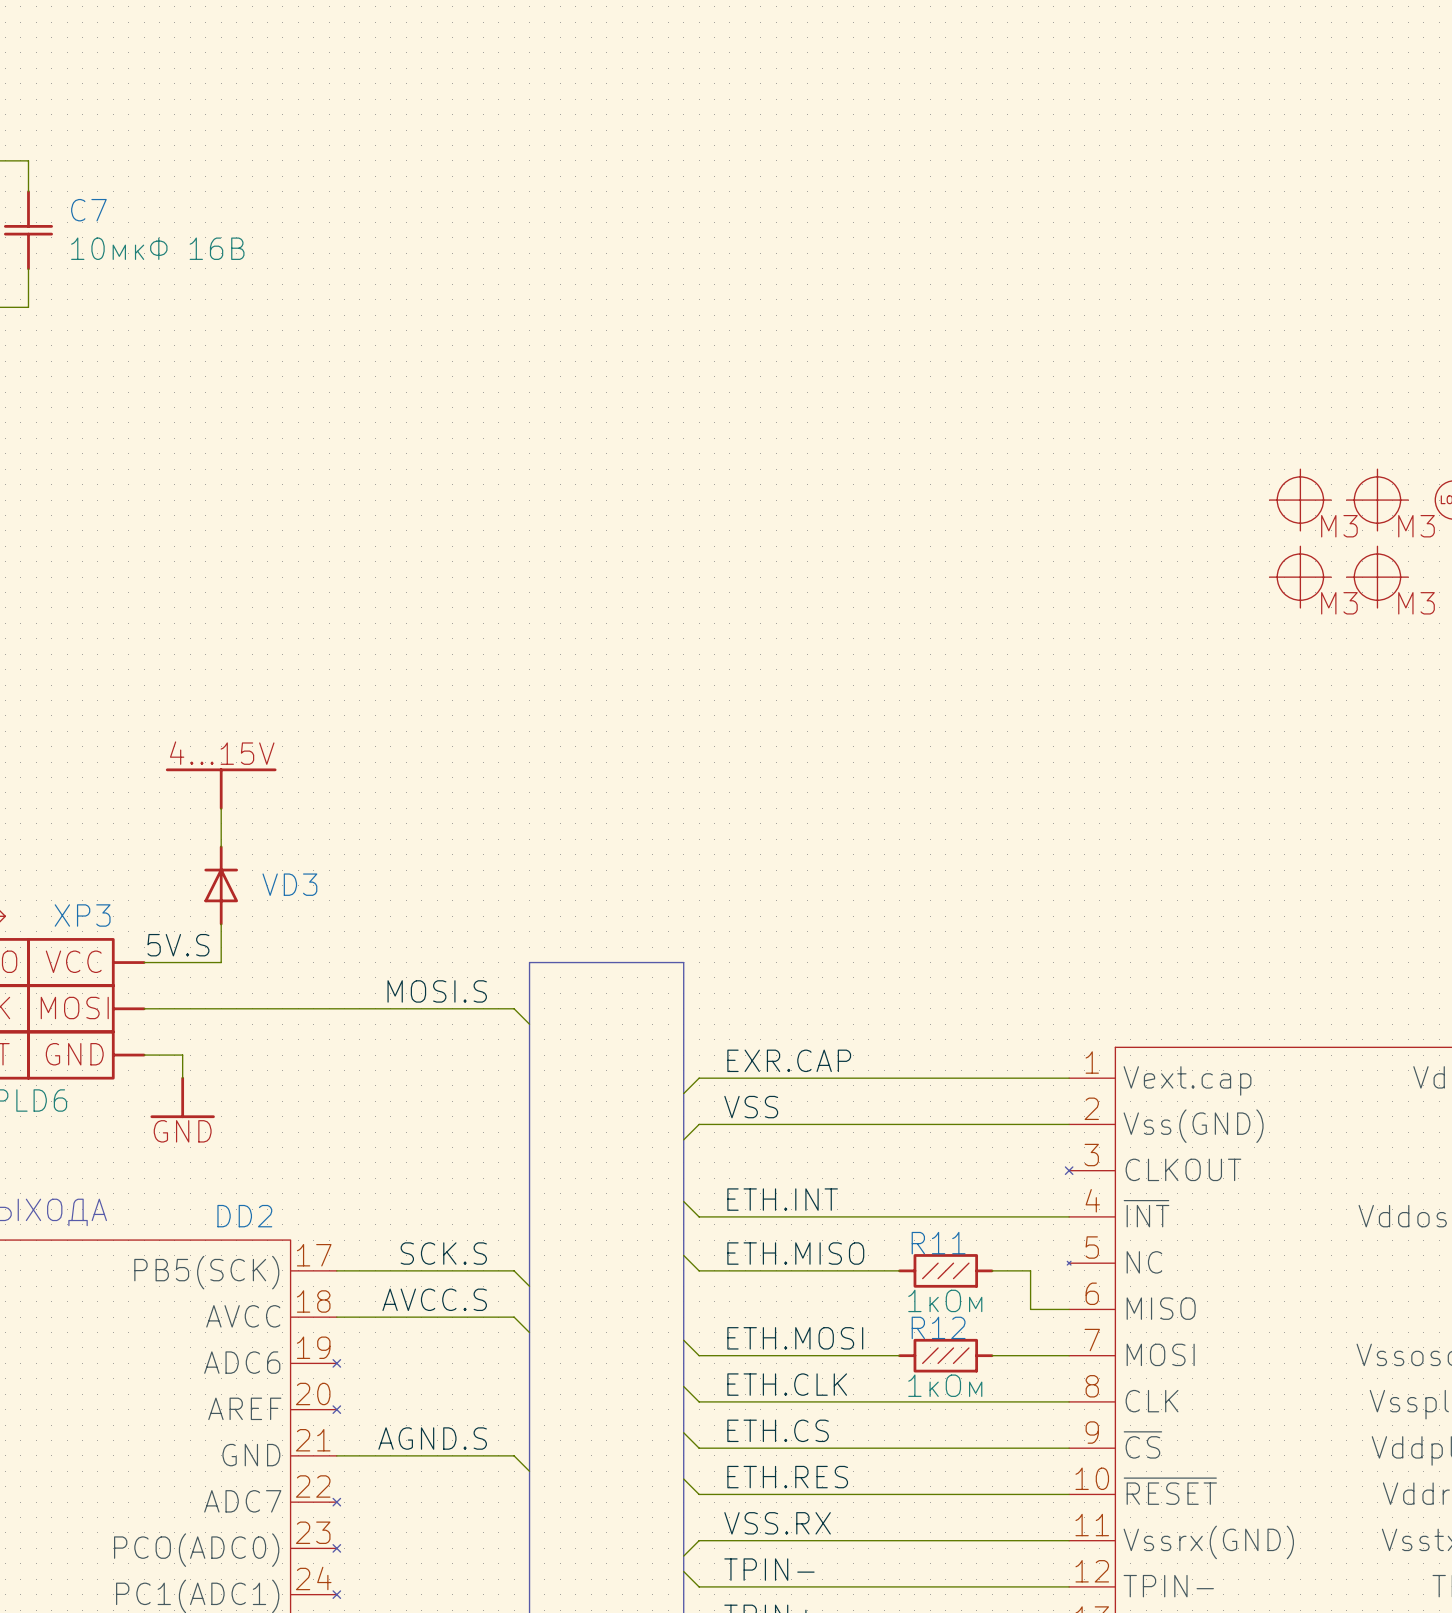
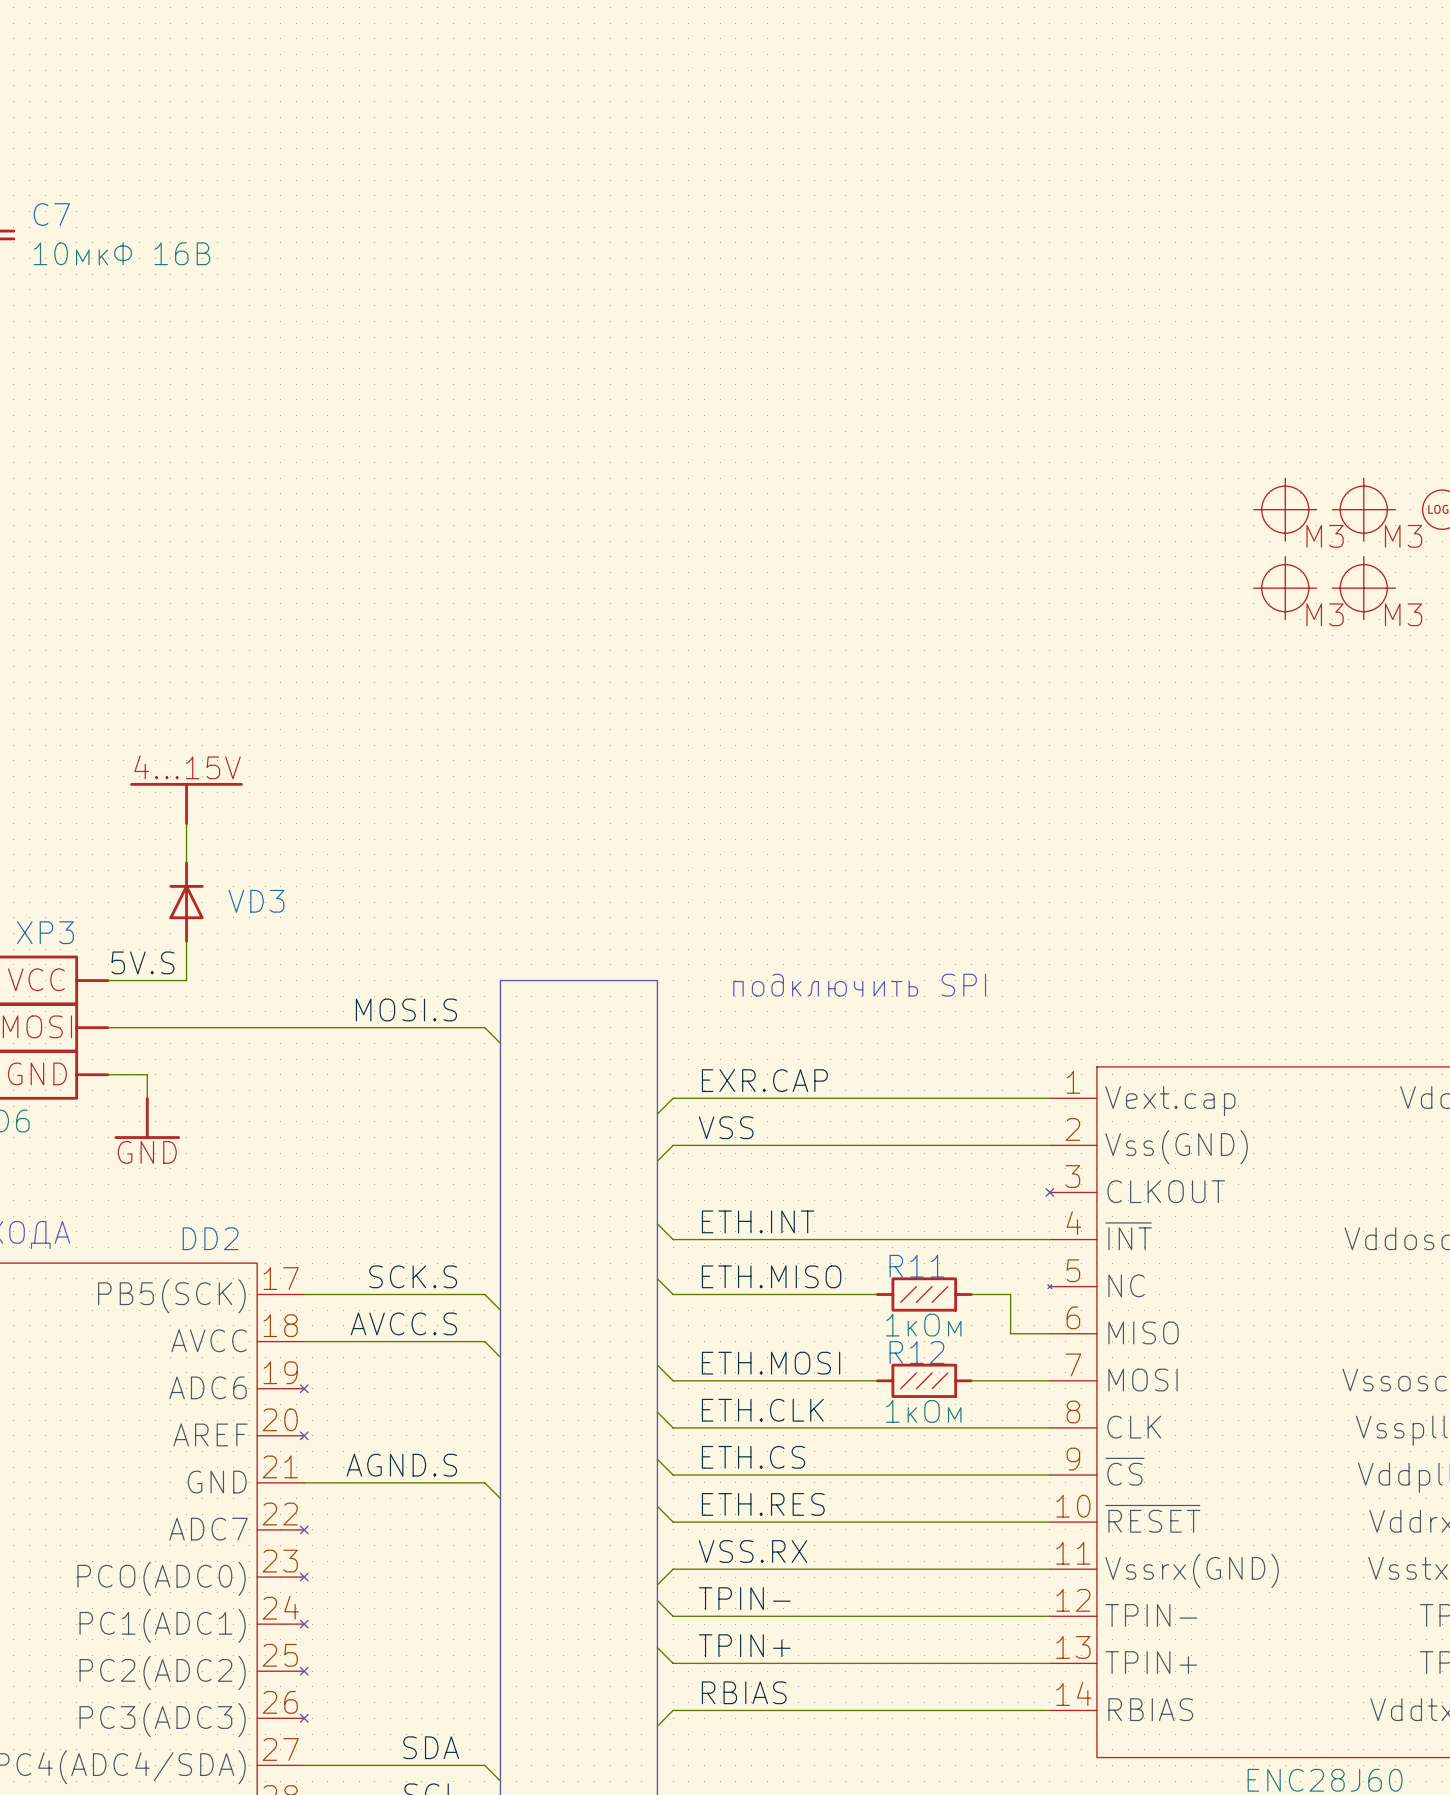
text: none -> подключить SPI (859, 985)

